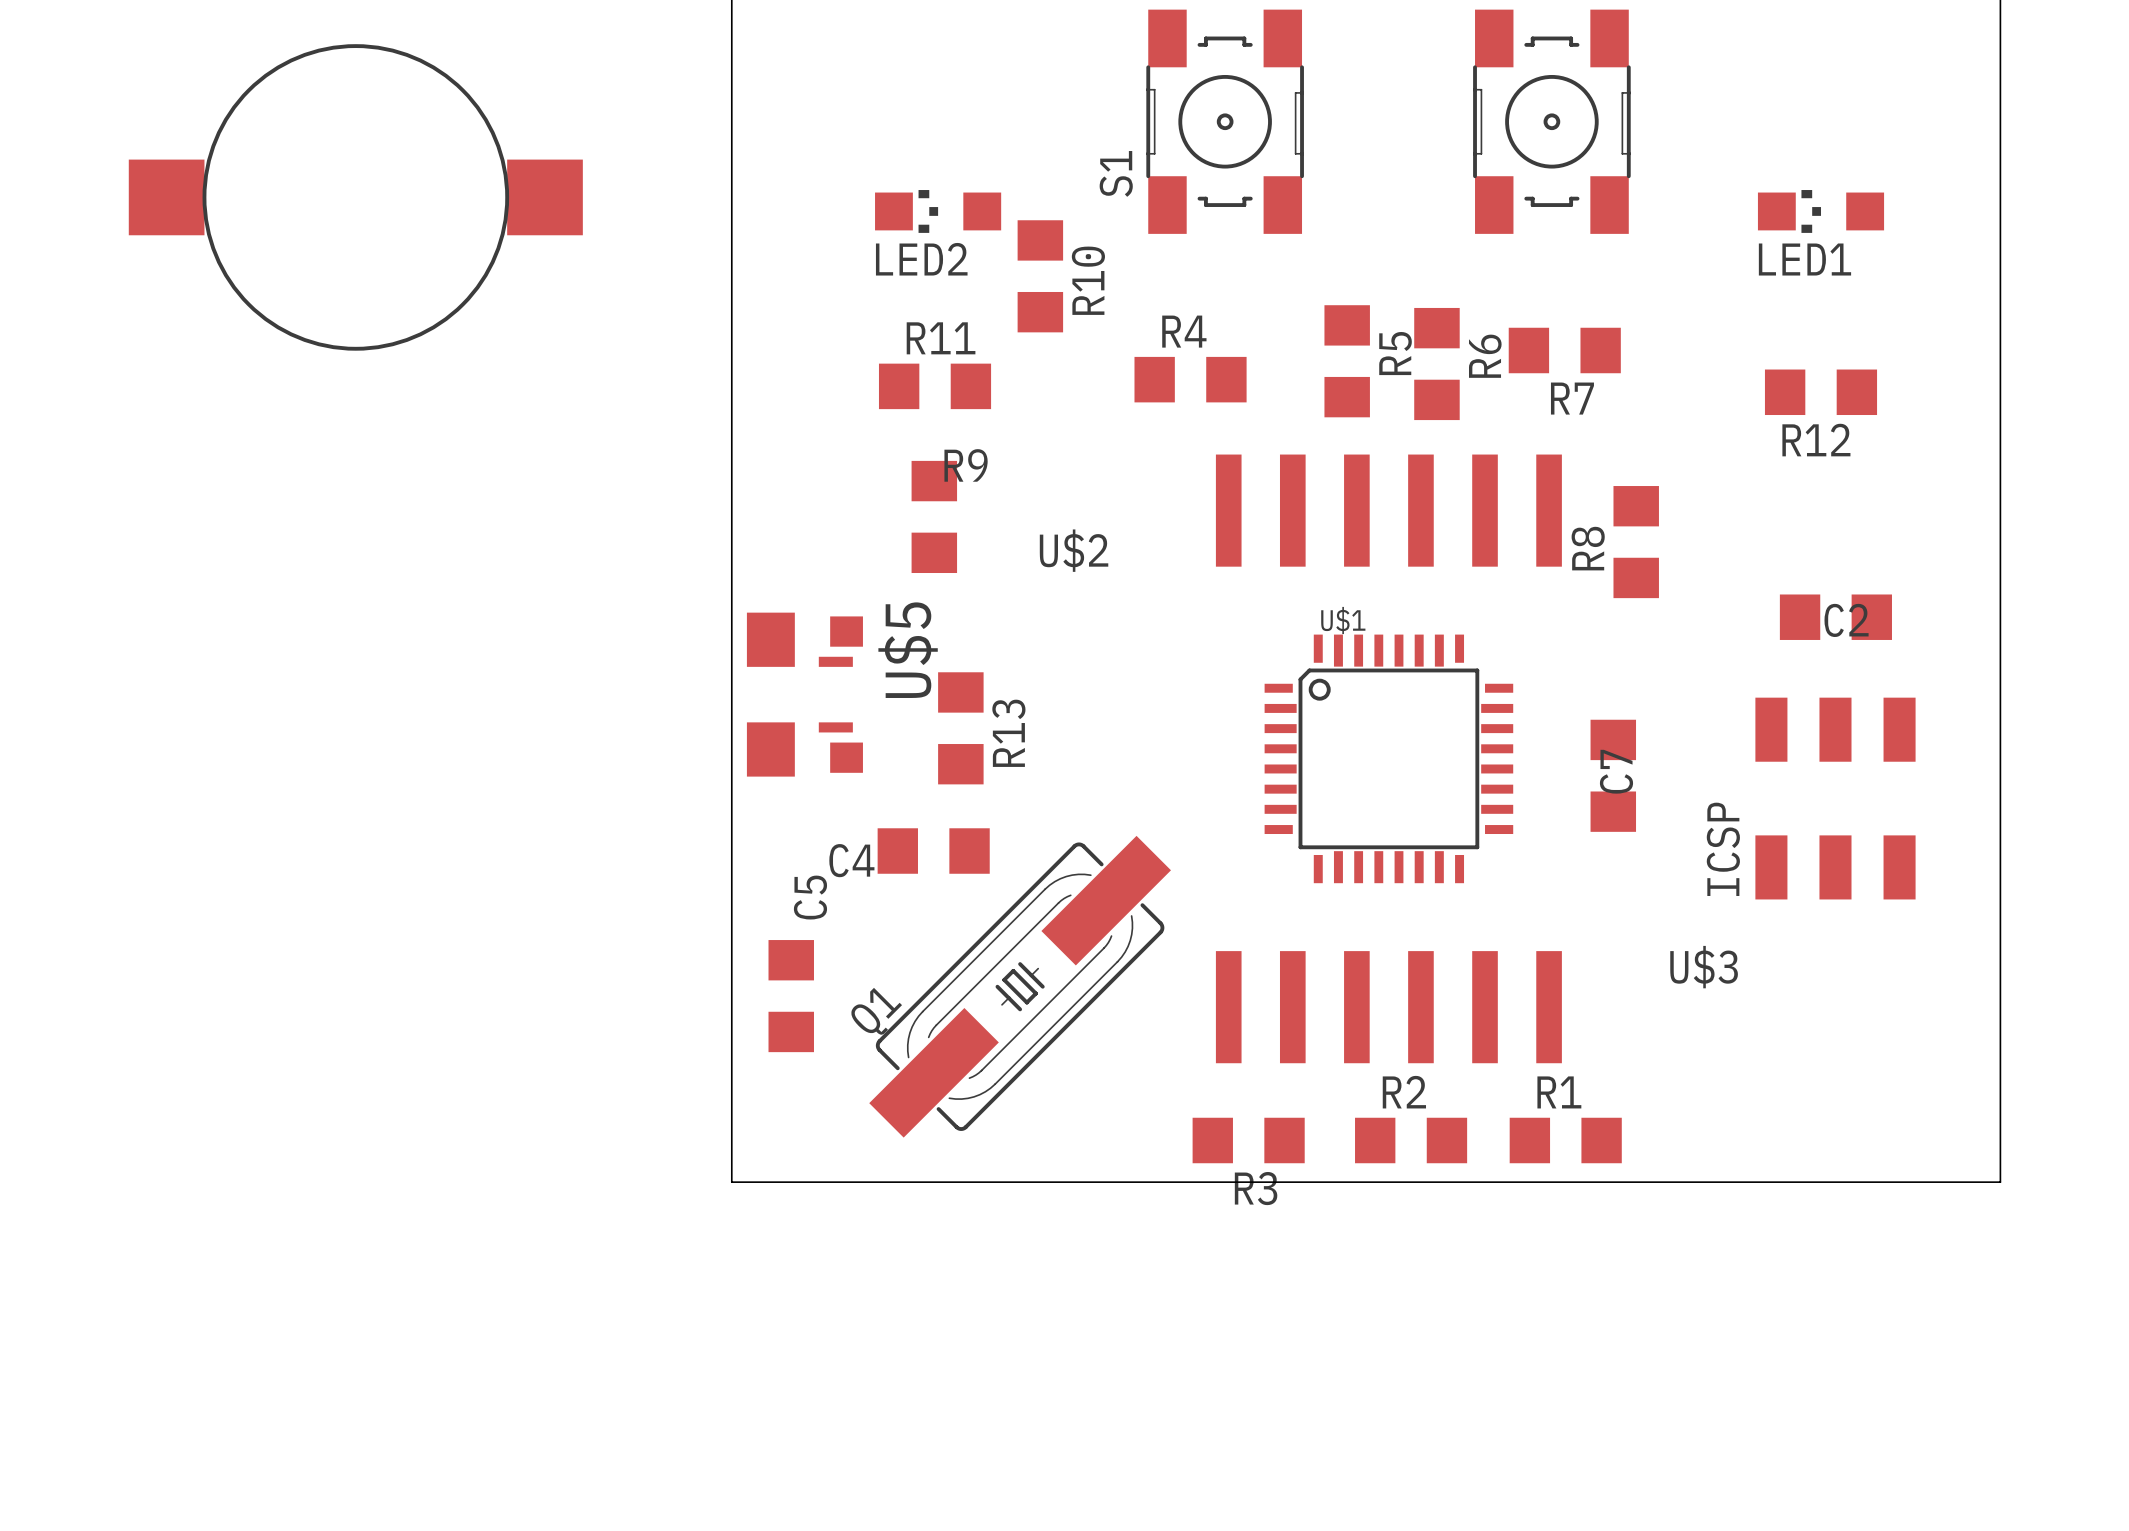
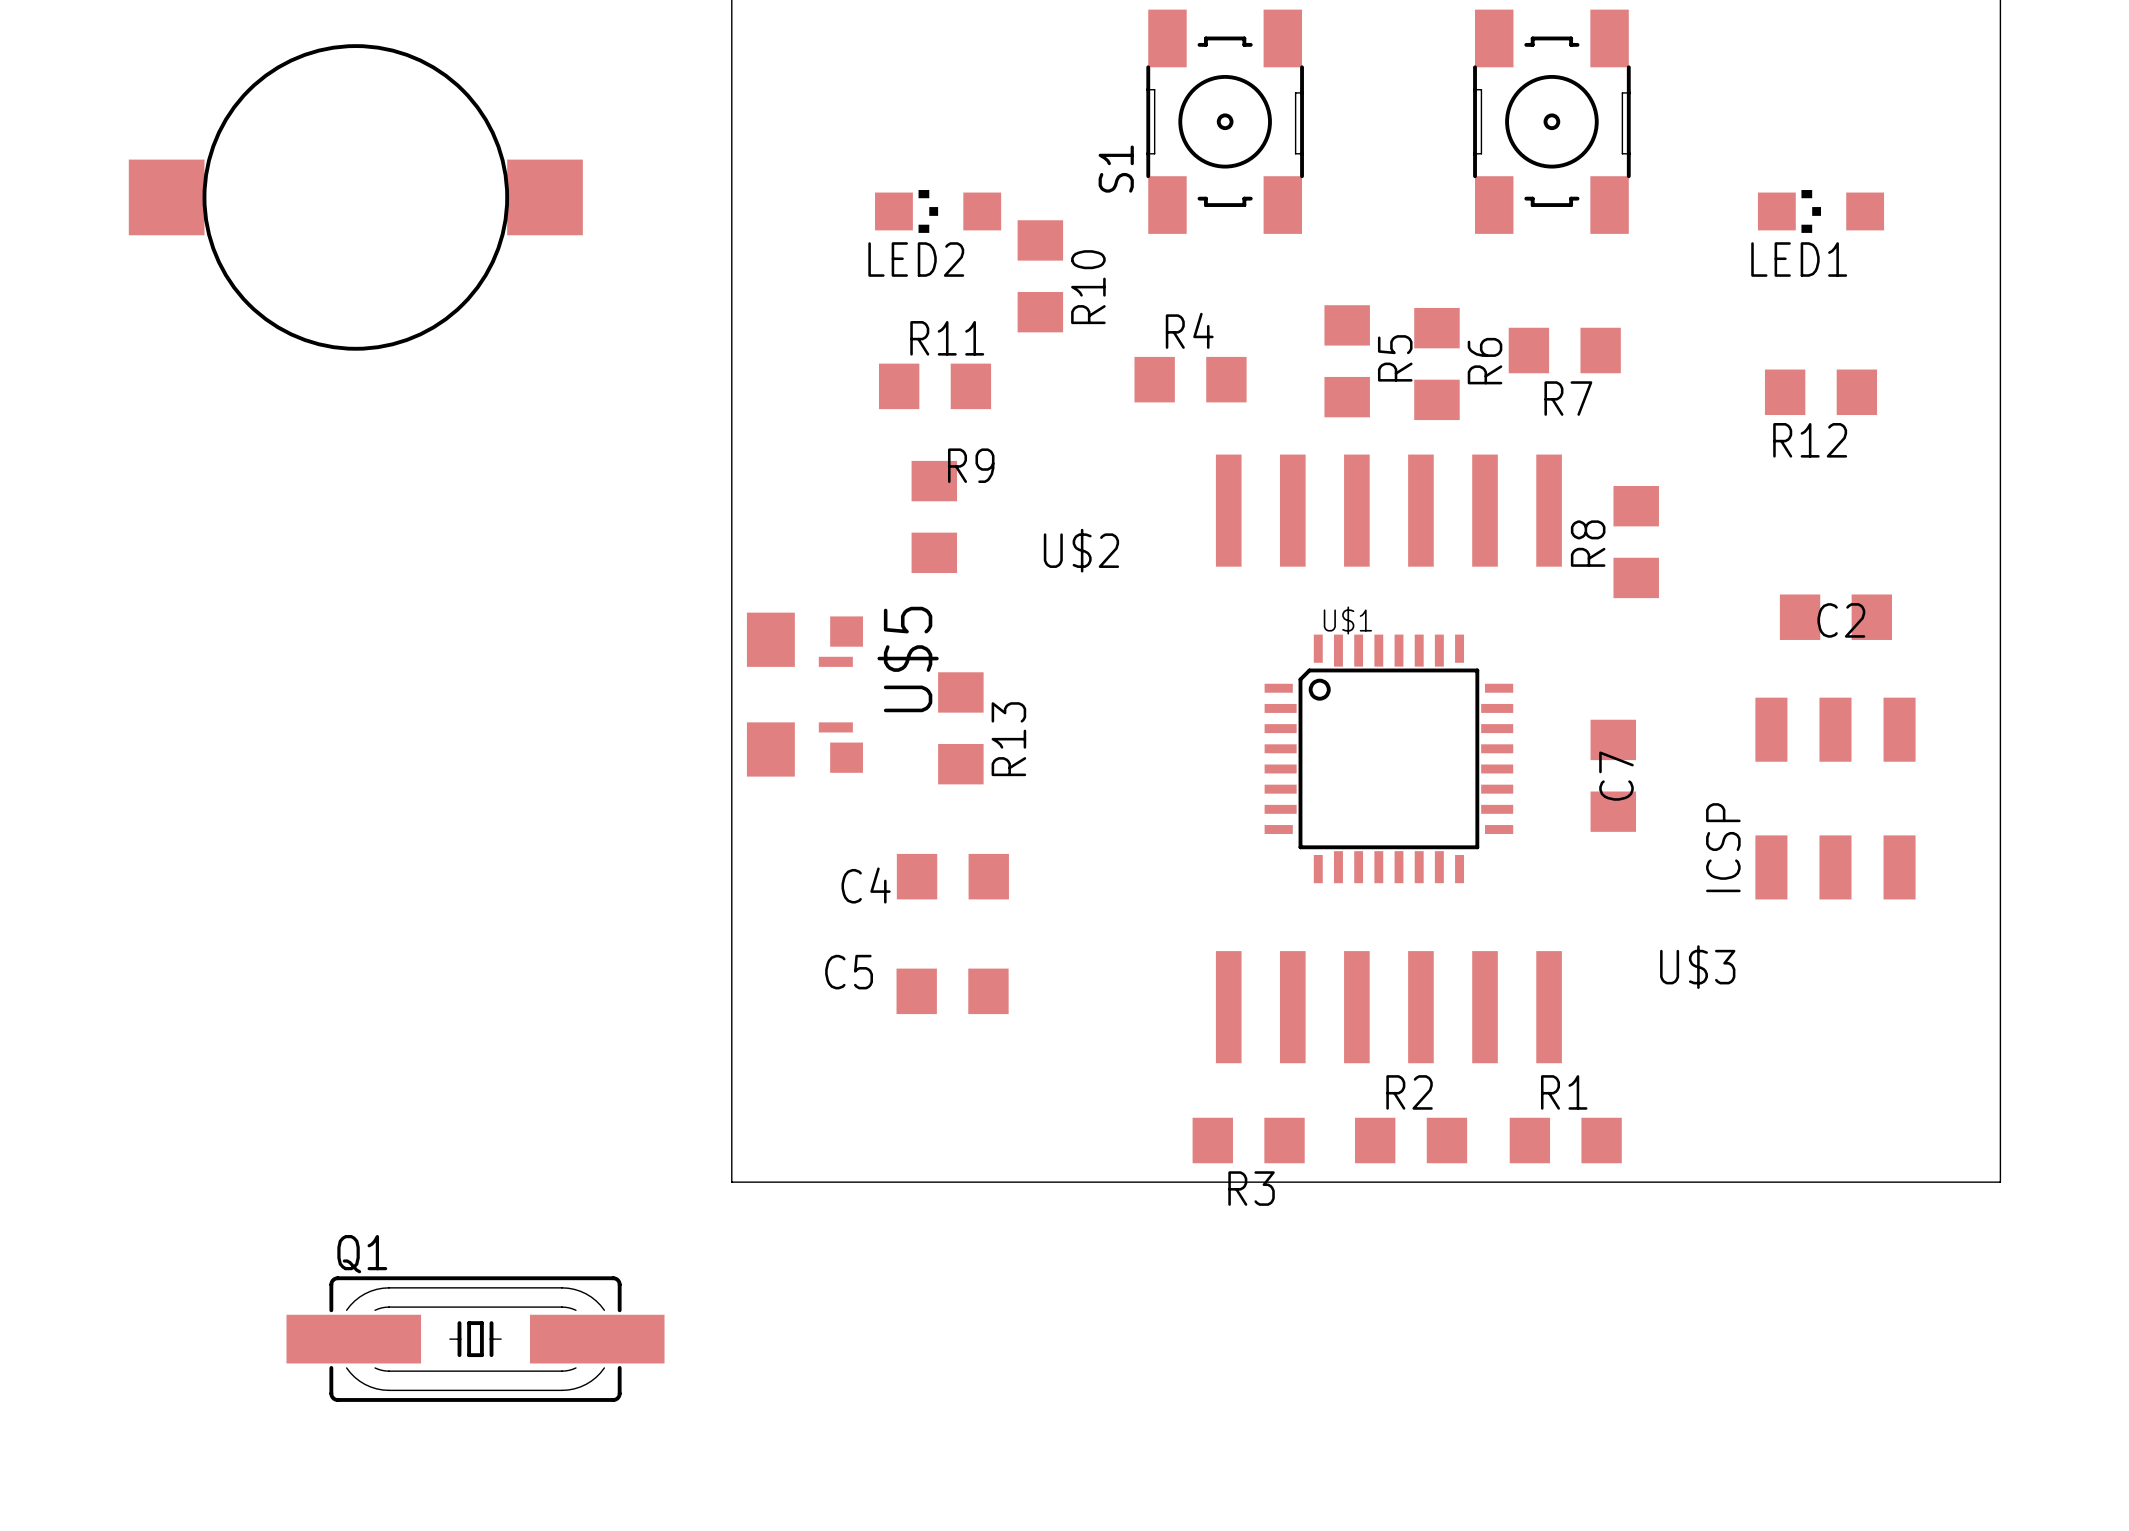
C4 position: (933, 851) -> (952, 876)
C5 name position: C5 (810, 897) -> C5 (849, 972)
Q1 rotation: 0° (1020, 986) -> 45° clockwise (475, 1339)
Q1 position: (1020, 986) -> (475, 1339)
C5 rotation: 0° (791, 996) -> 90° clockwise (952, 991)
C5 position: (791, 996) -> (952, 991)

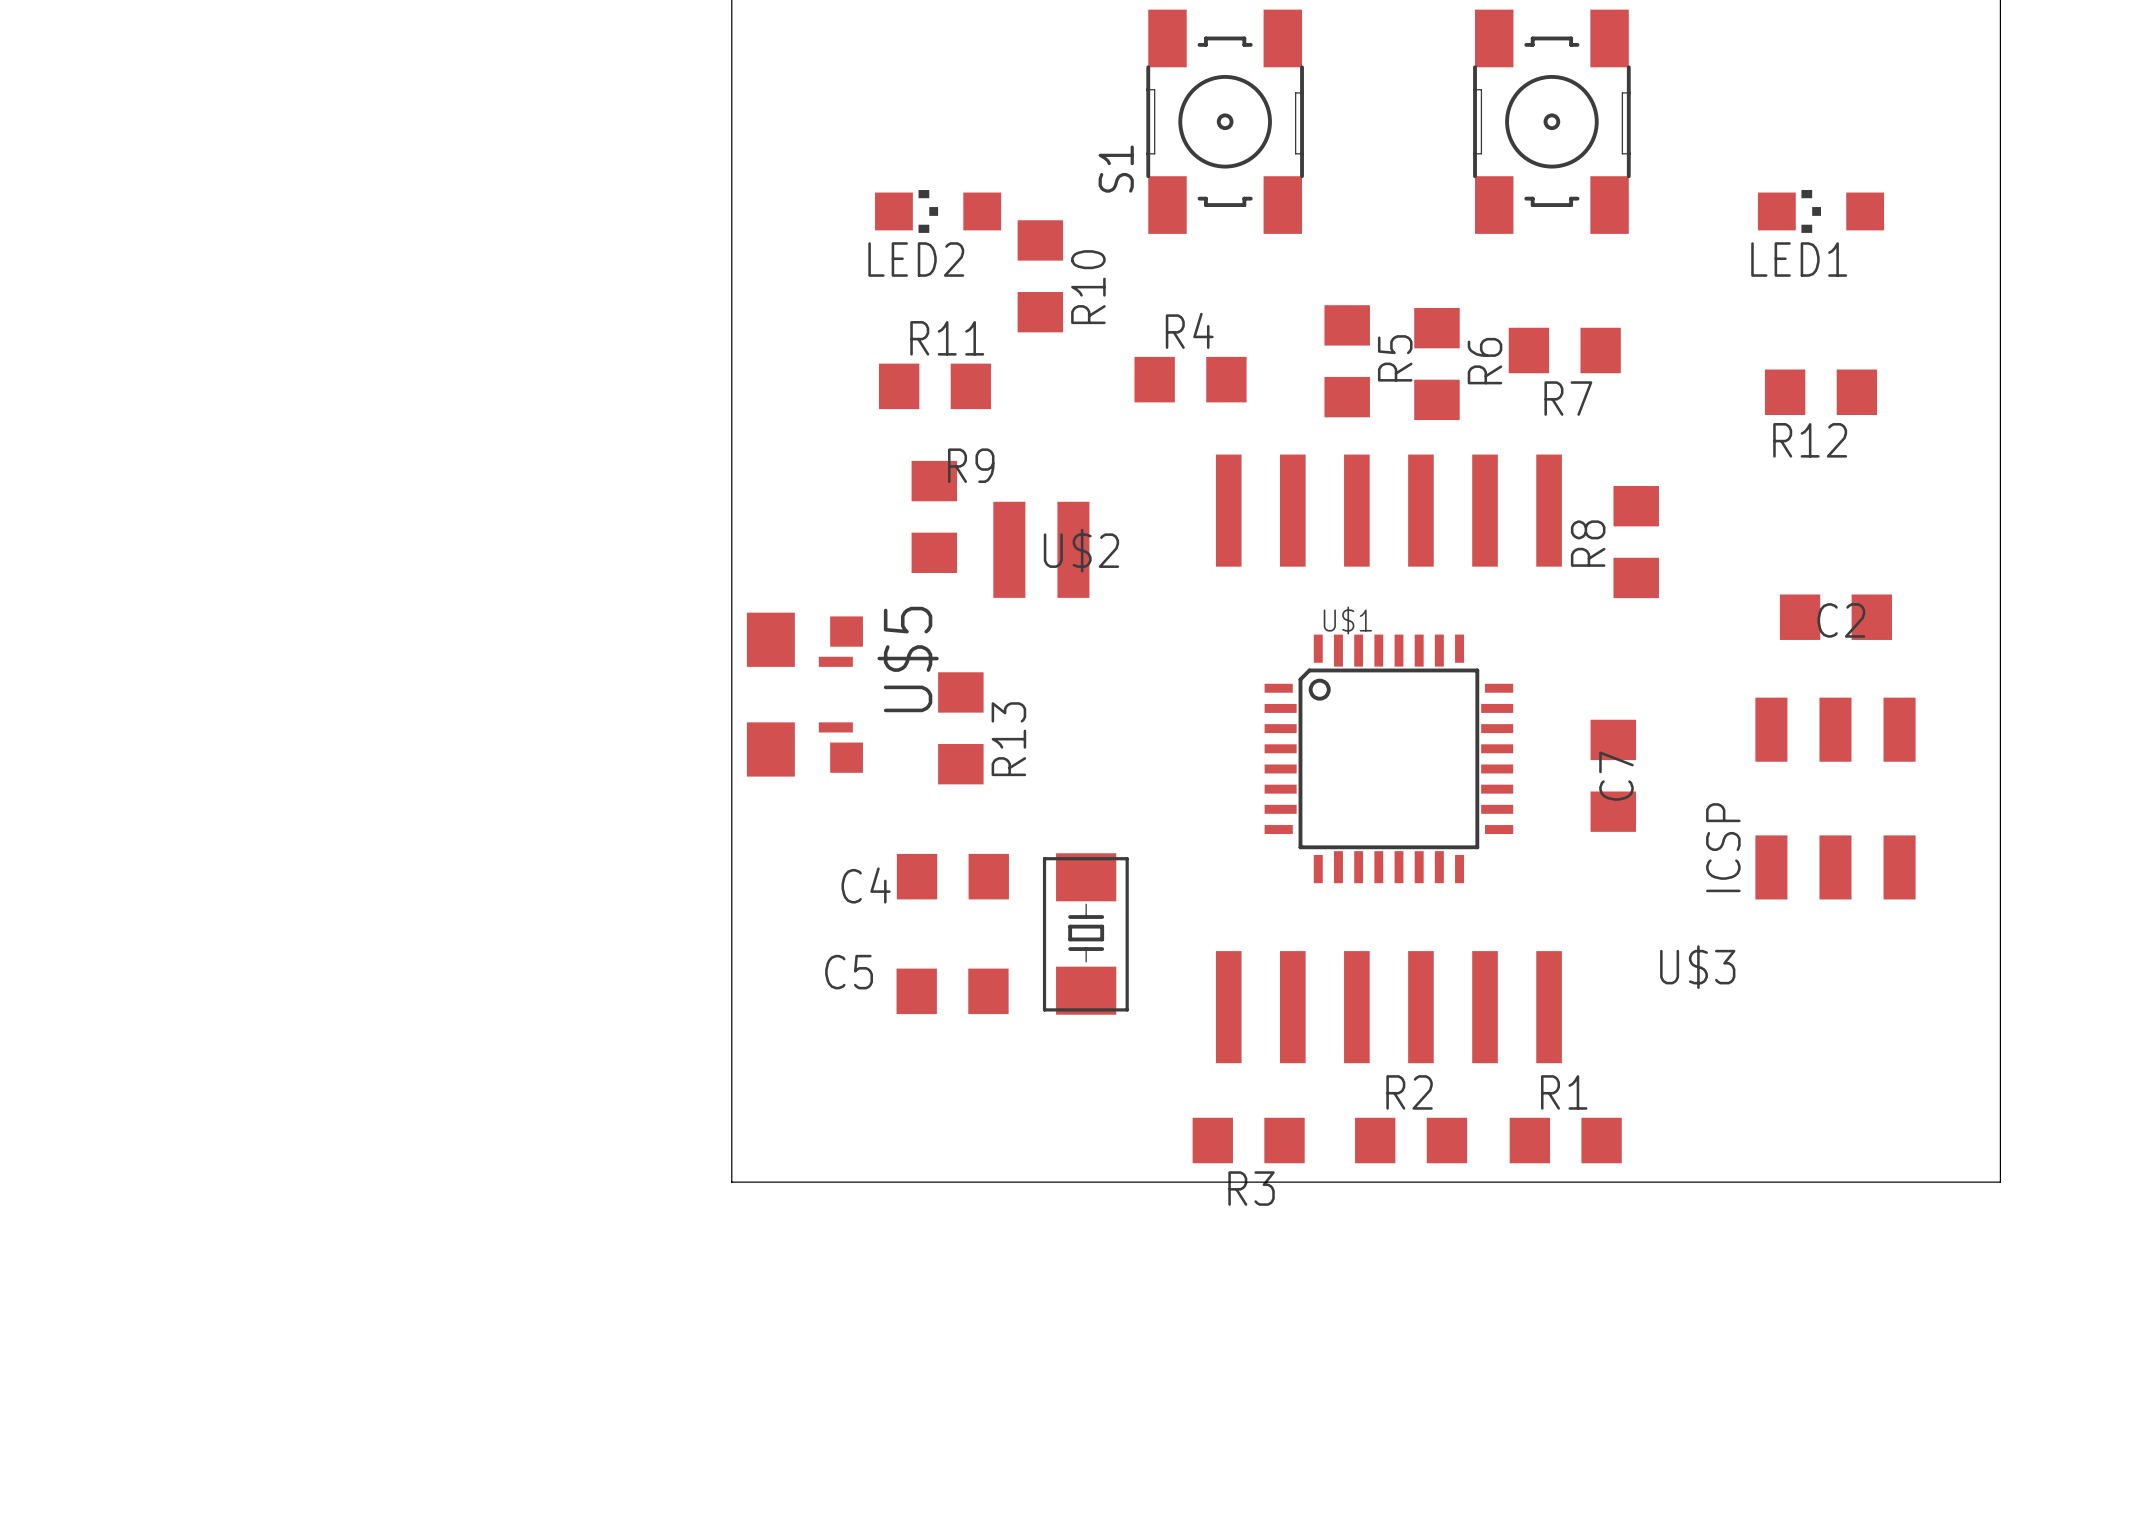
part: (355, 197) -> none
part: none -> (1041, 549)
part: none -> (1085, 933)
Q1: (475, 1339) -> none

